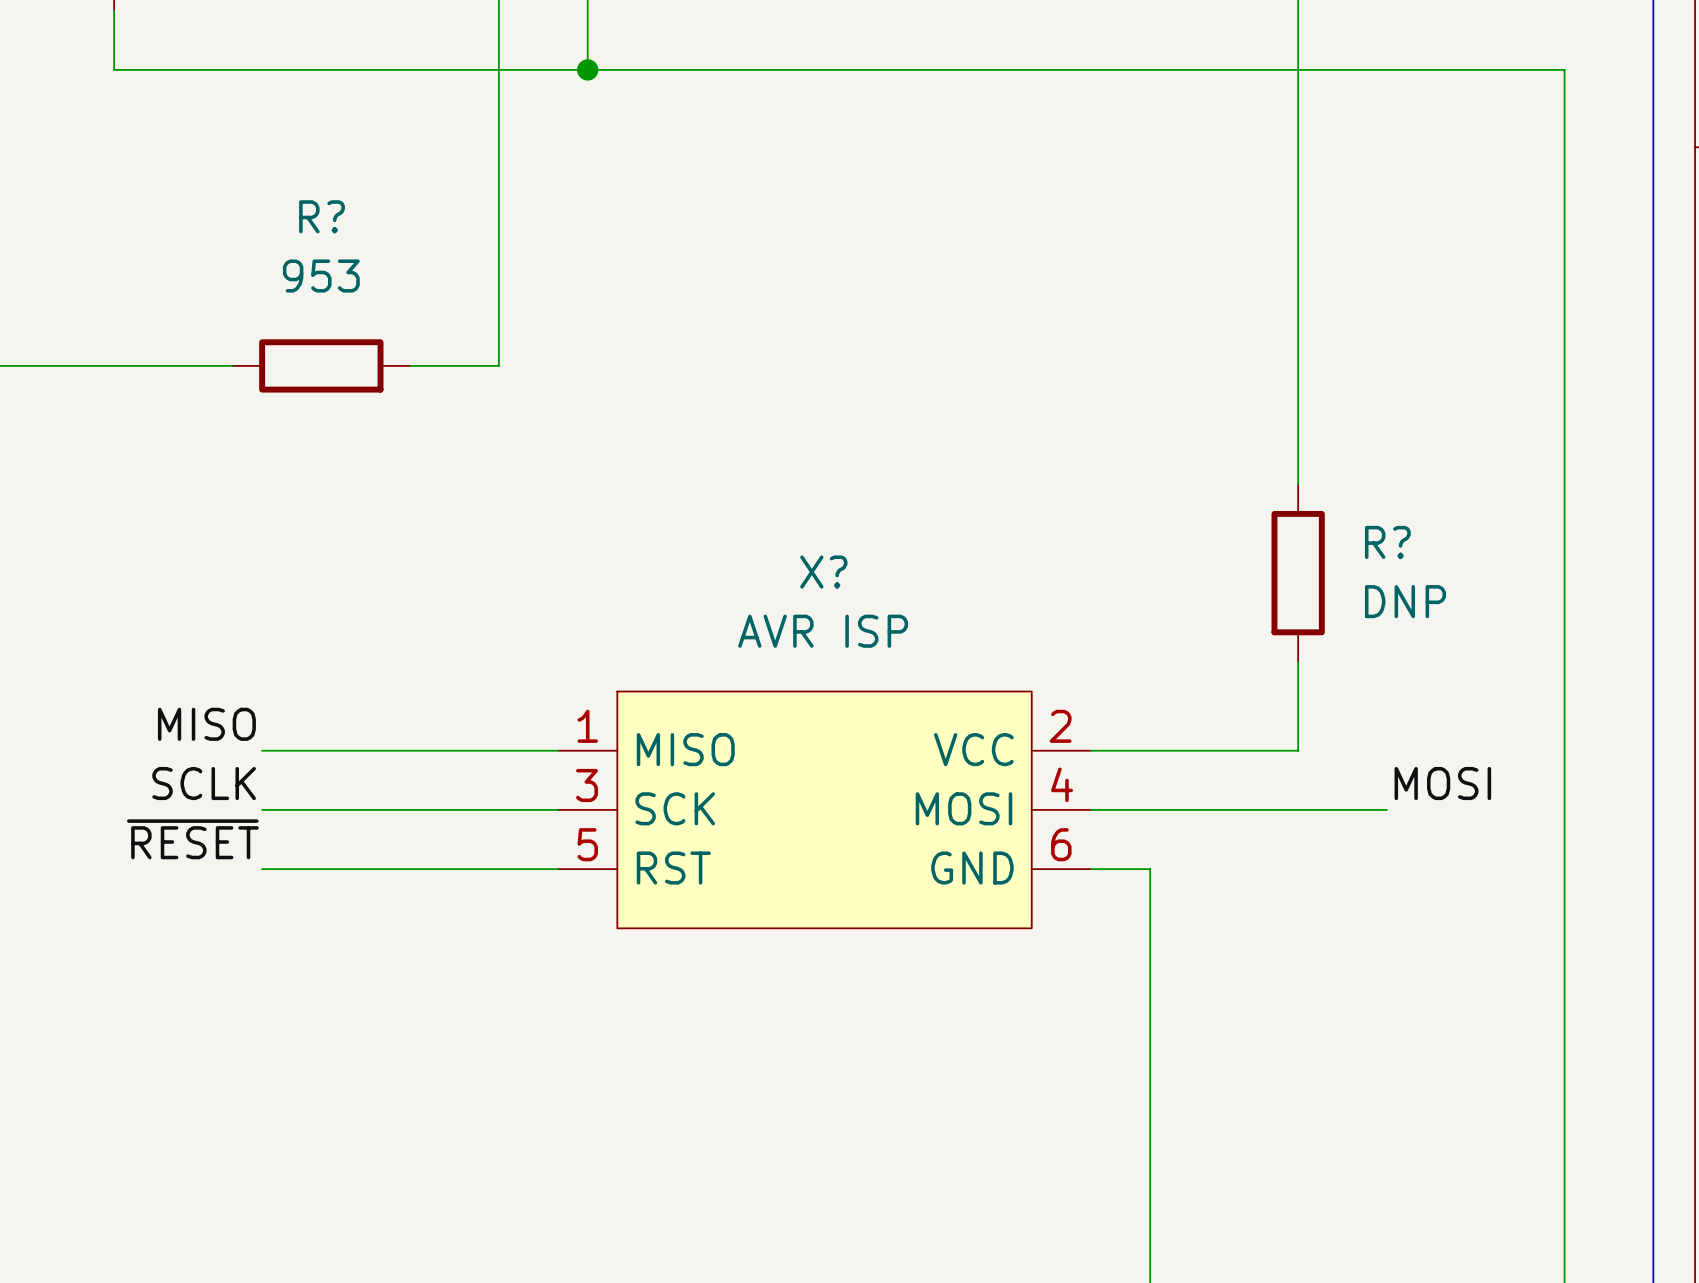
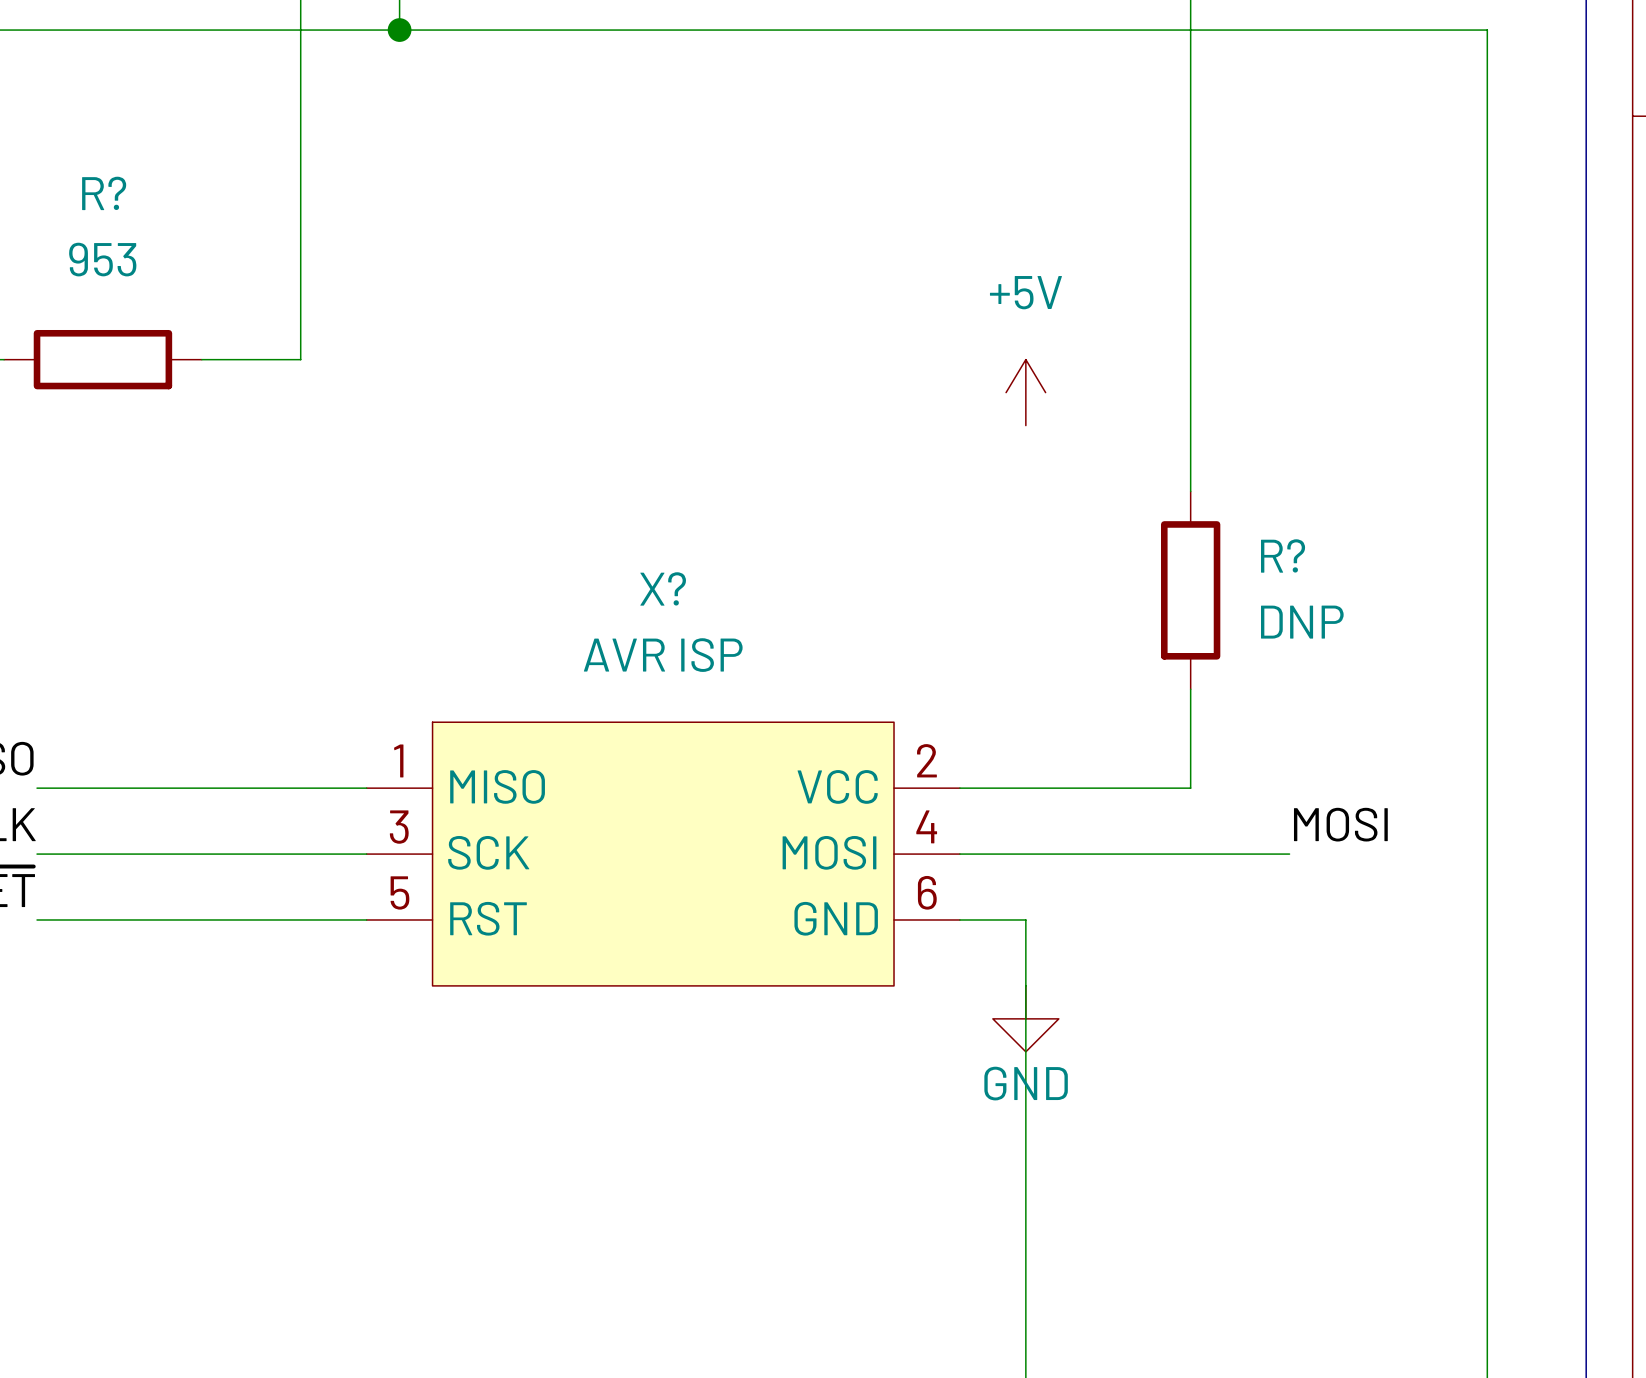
power symbol: none -> +5V (1025, 392)
power symbol: none -> GND (1025, 1018)

